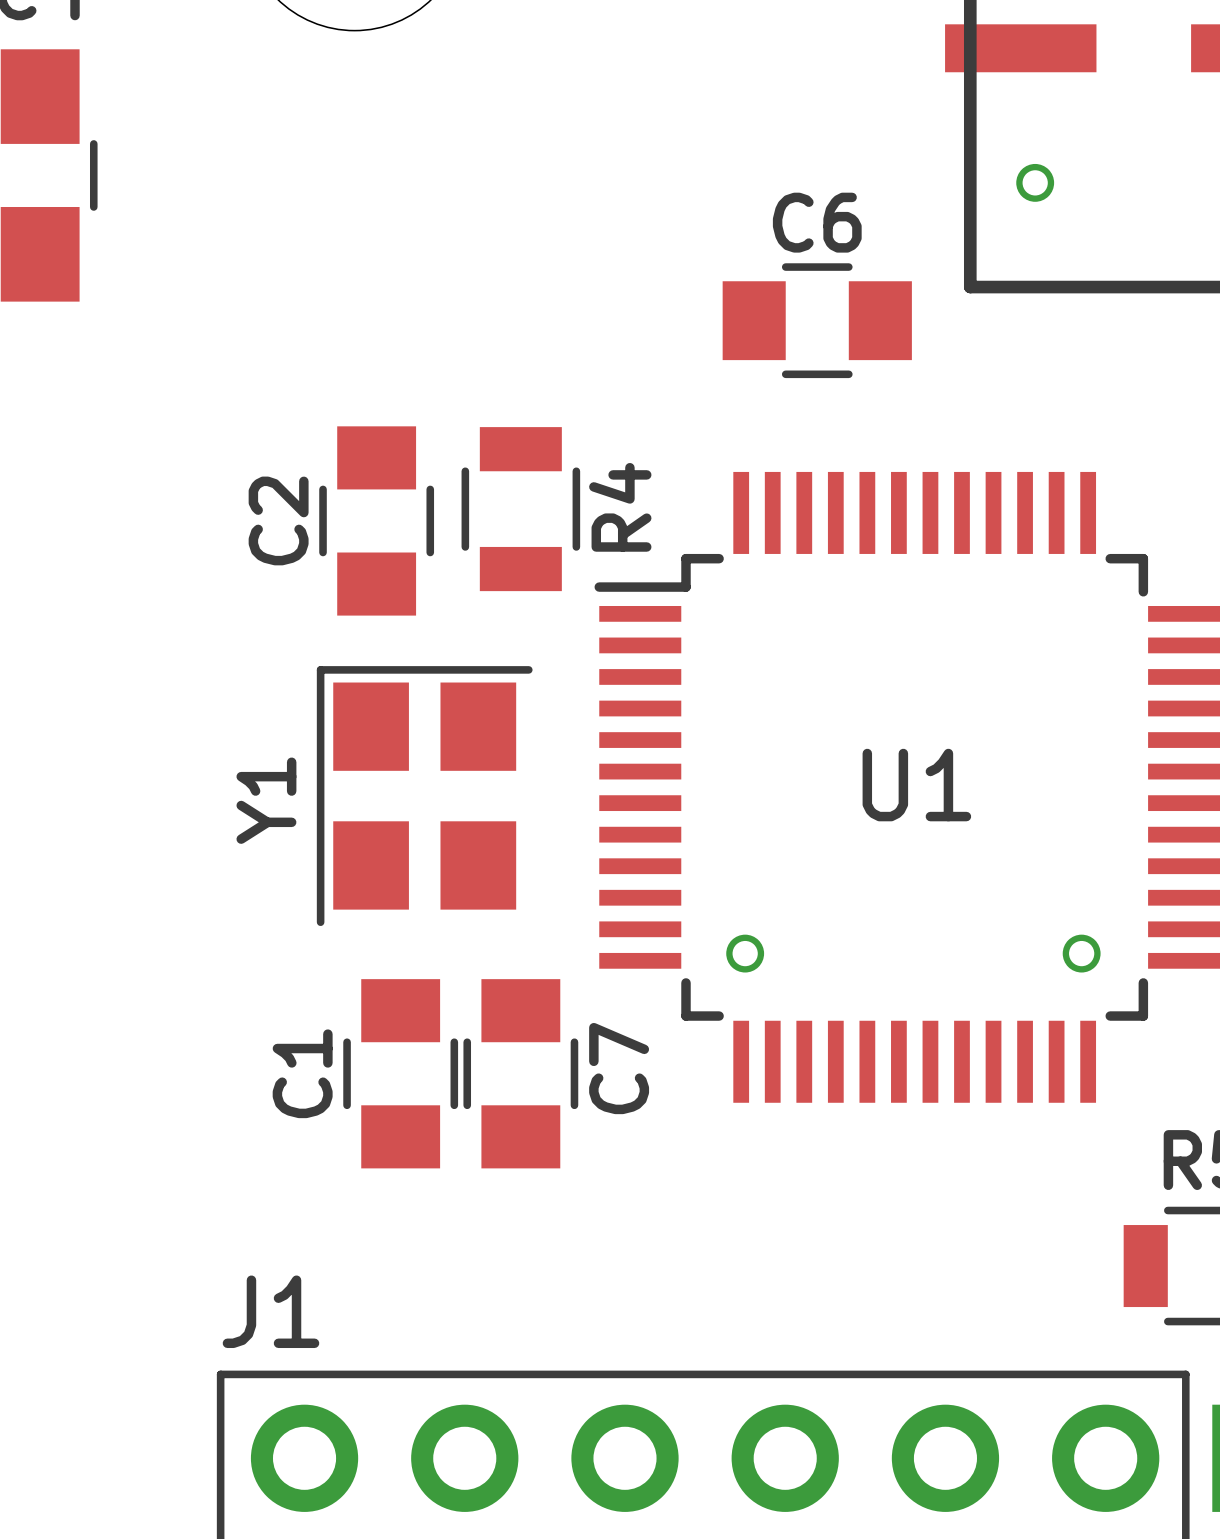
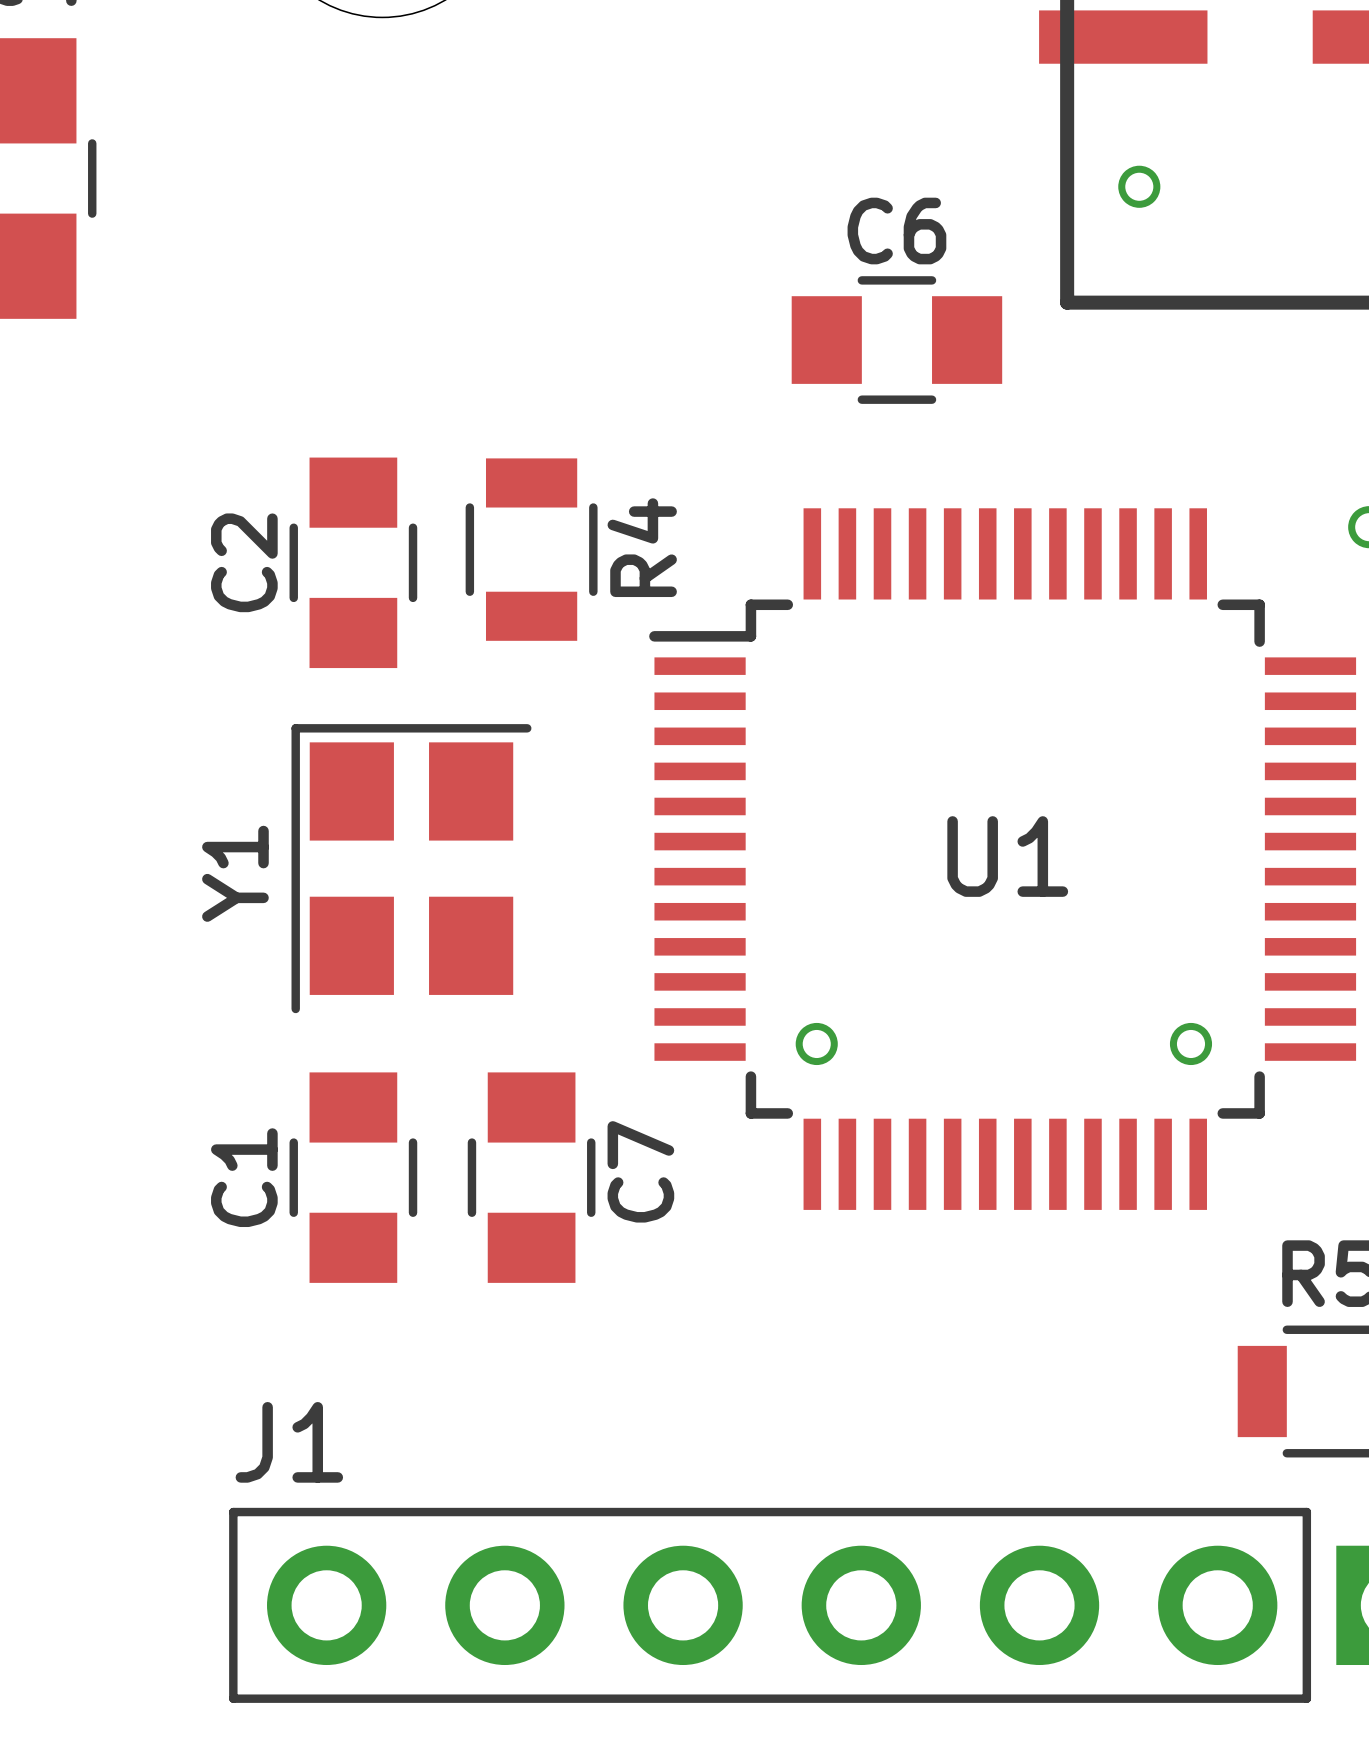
R4 position: (520, 509) -> (531, 549)
C2 position: (376, 520) -> (353, 562)
Y1 position: (424, 796) -> (411, 868)
C1 position: (400, 1073) -> (353, 1177)
C7 position: (520, 1073) -> (531, 1177)

